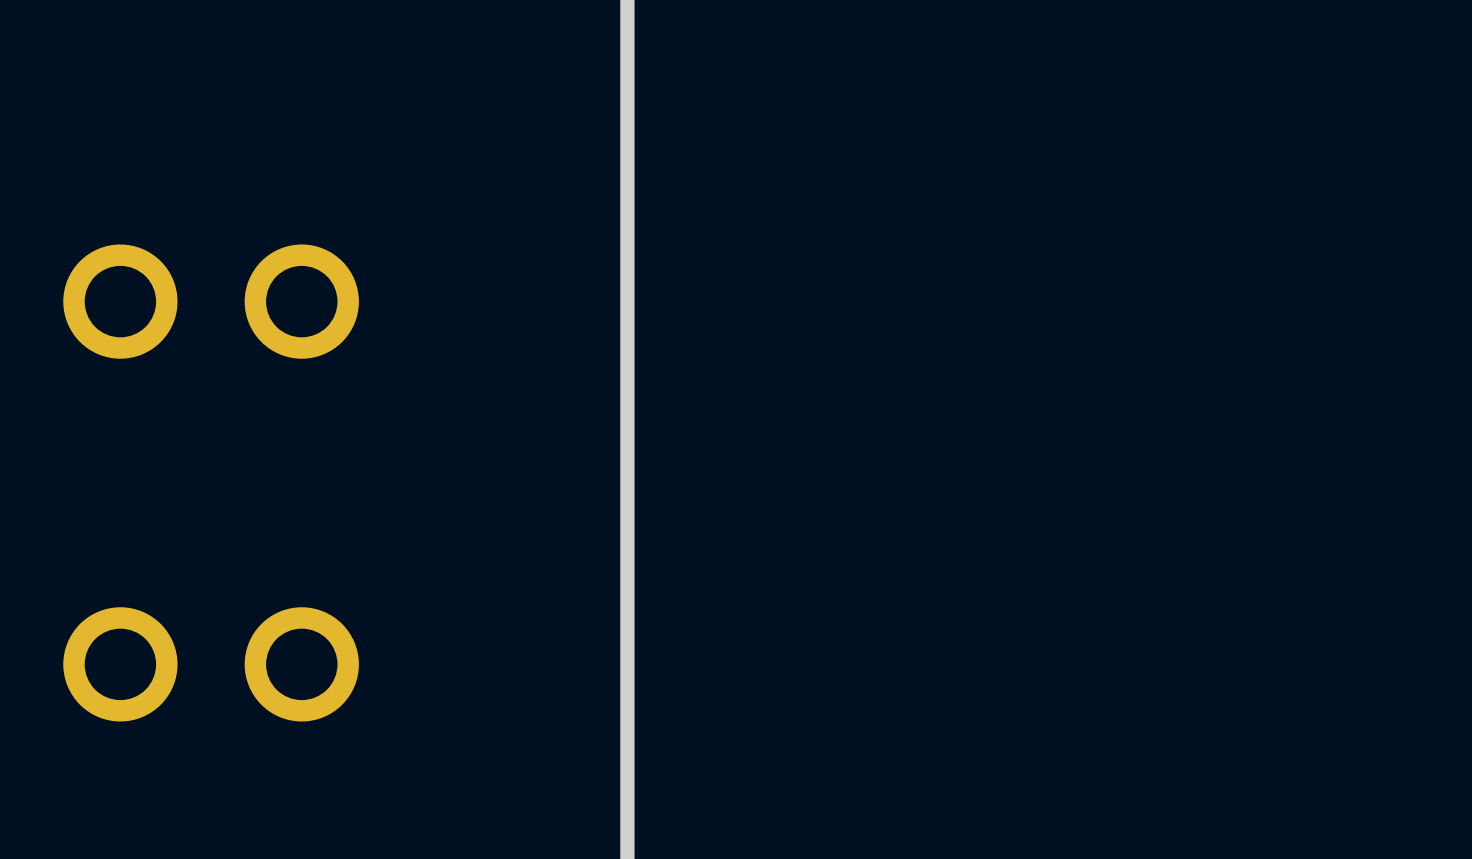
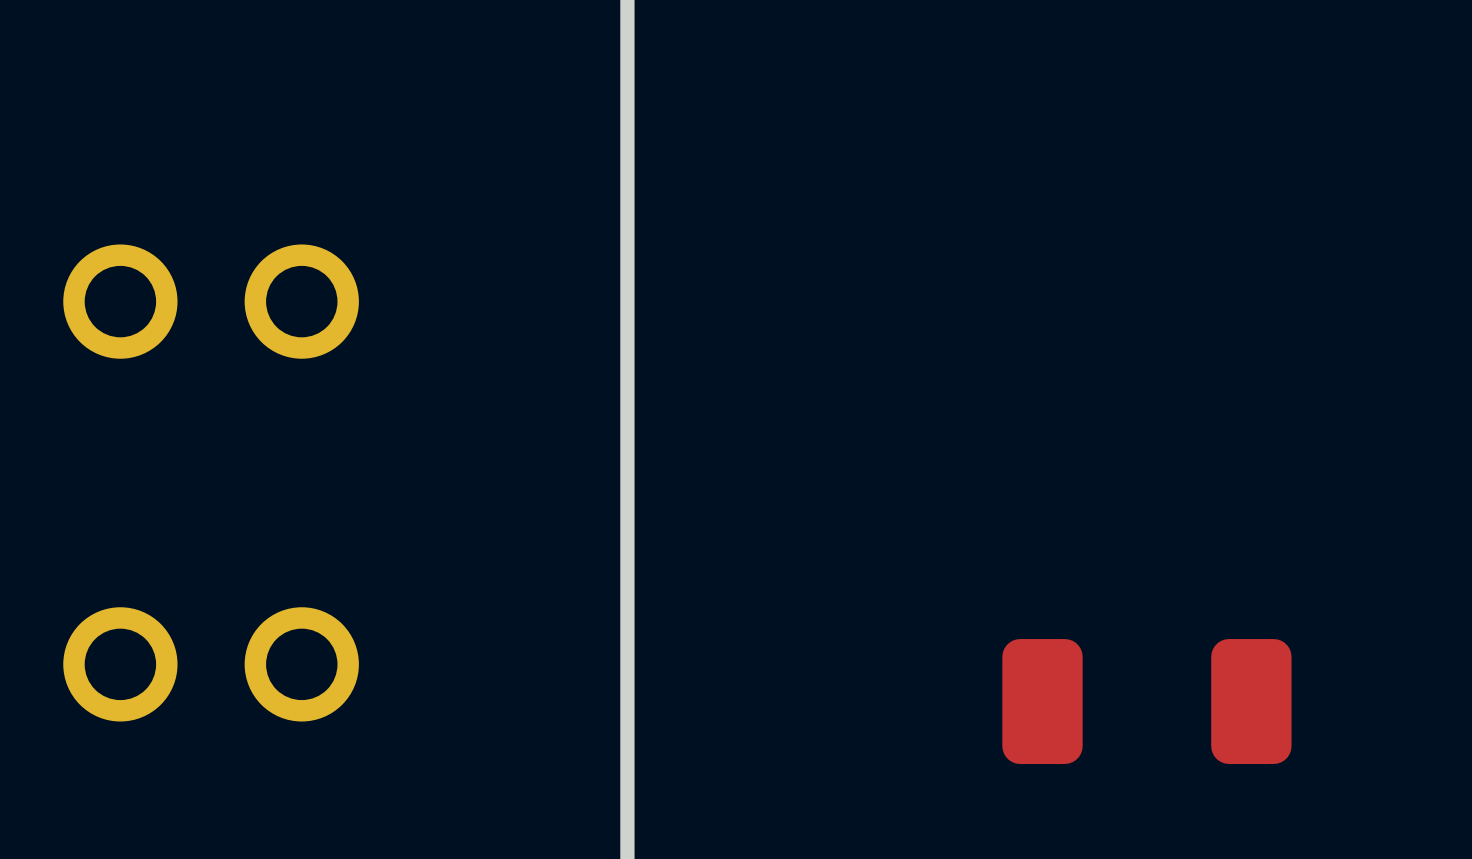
part: none -> (1146, 701)

